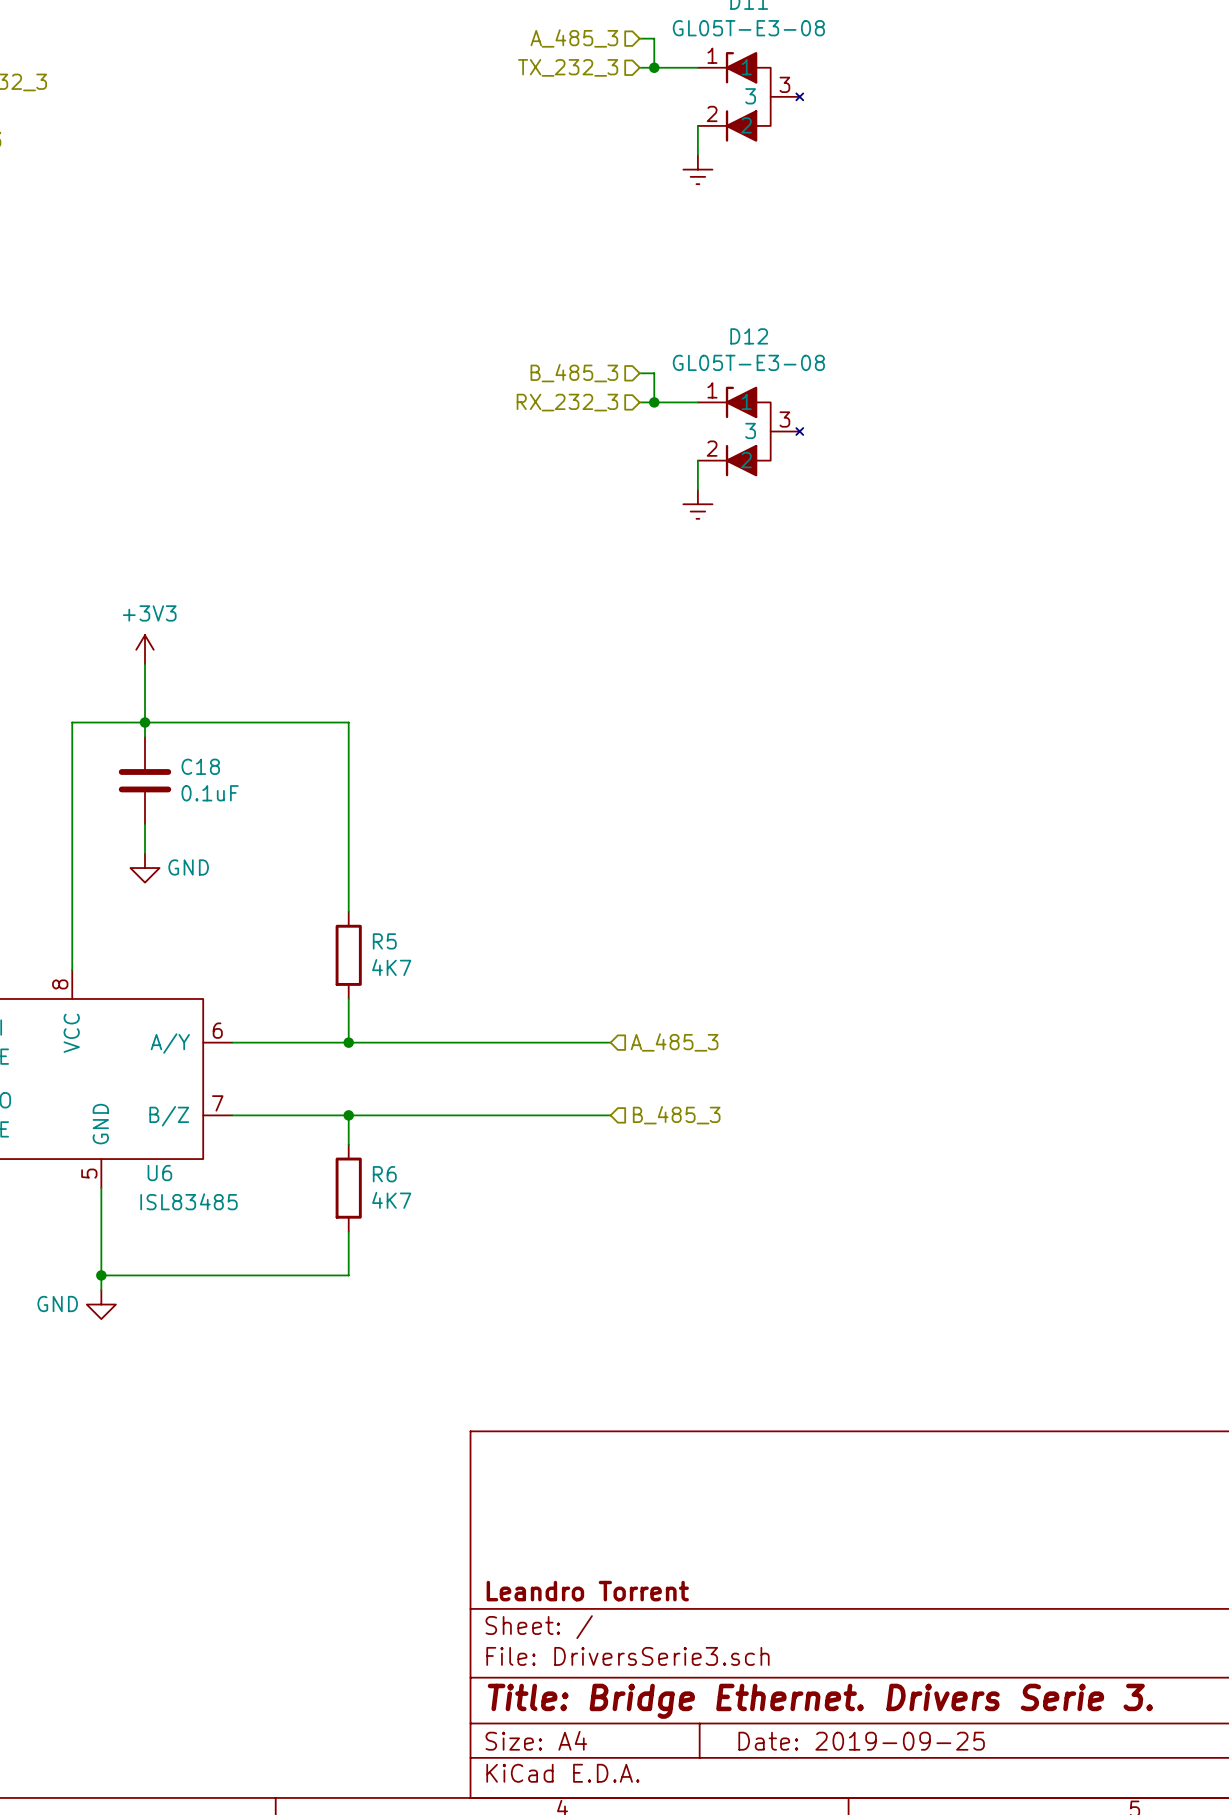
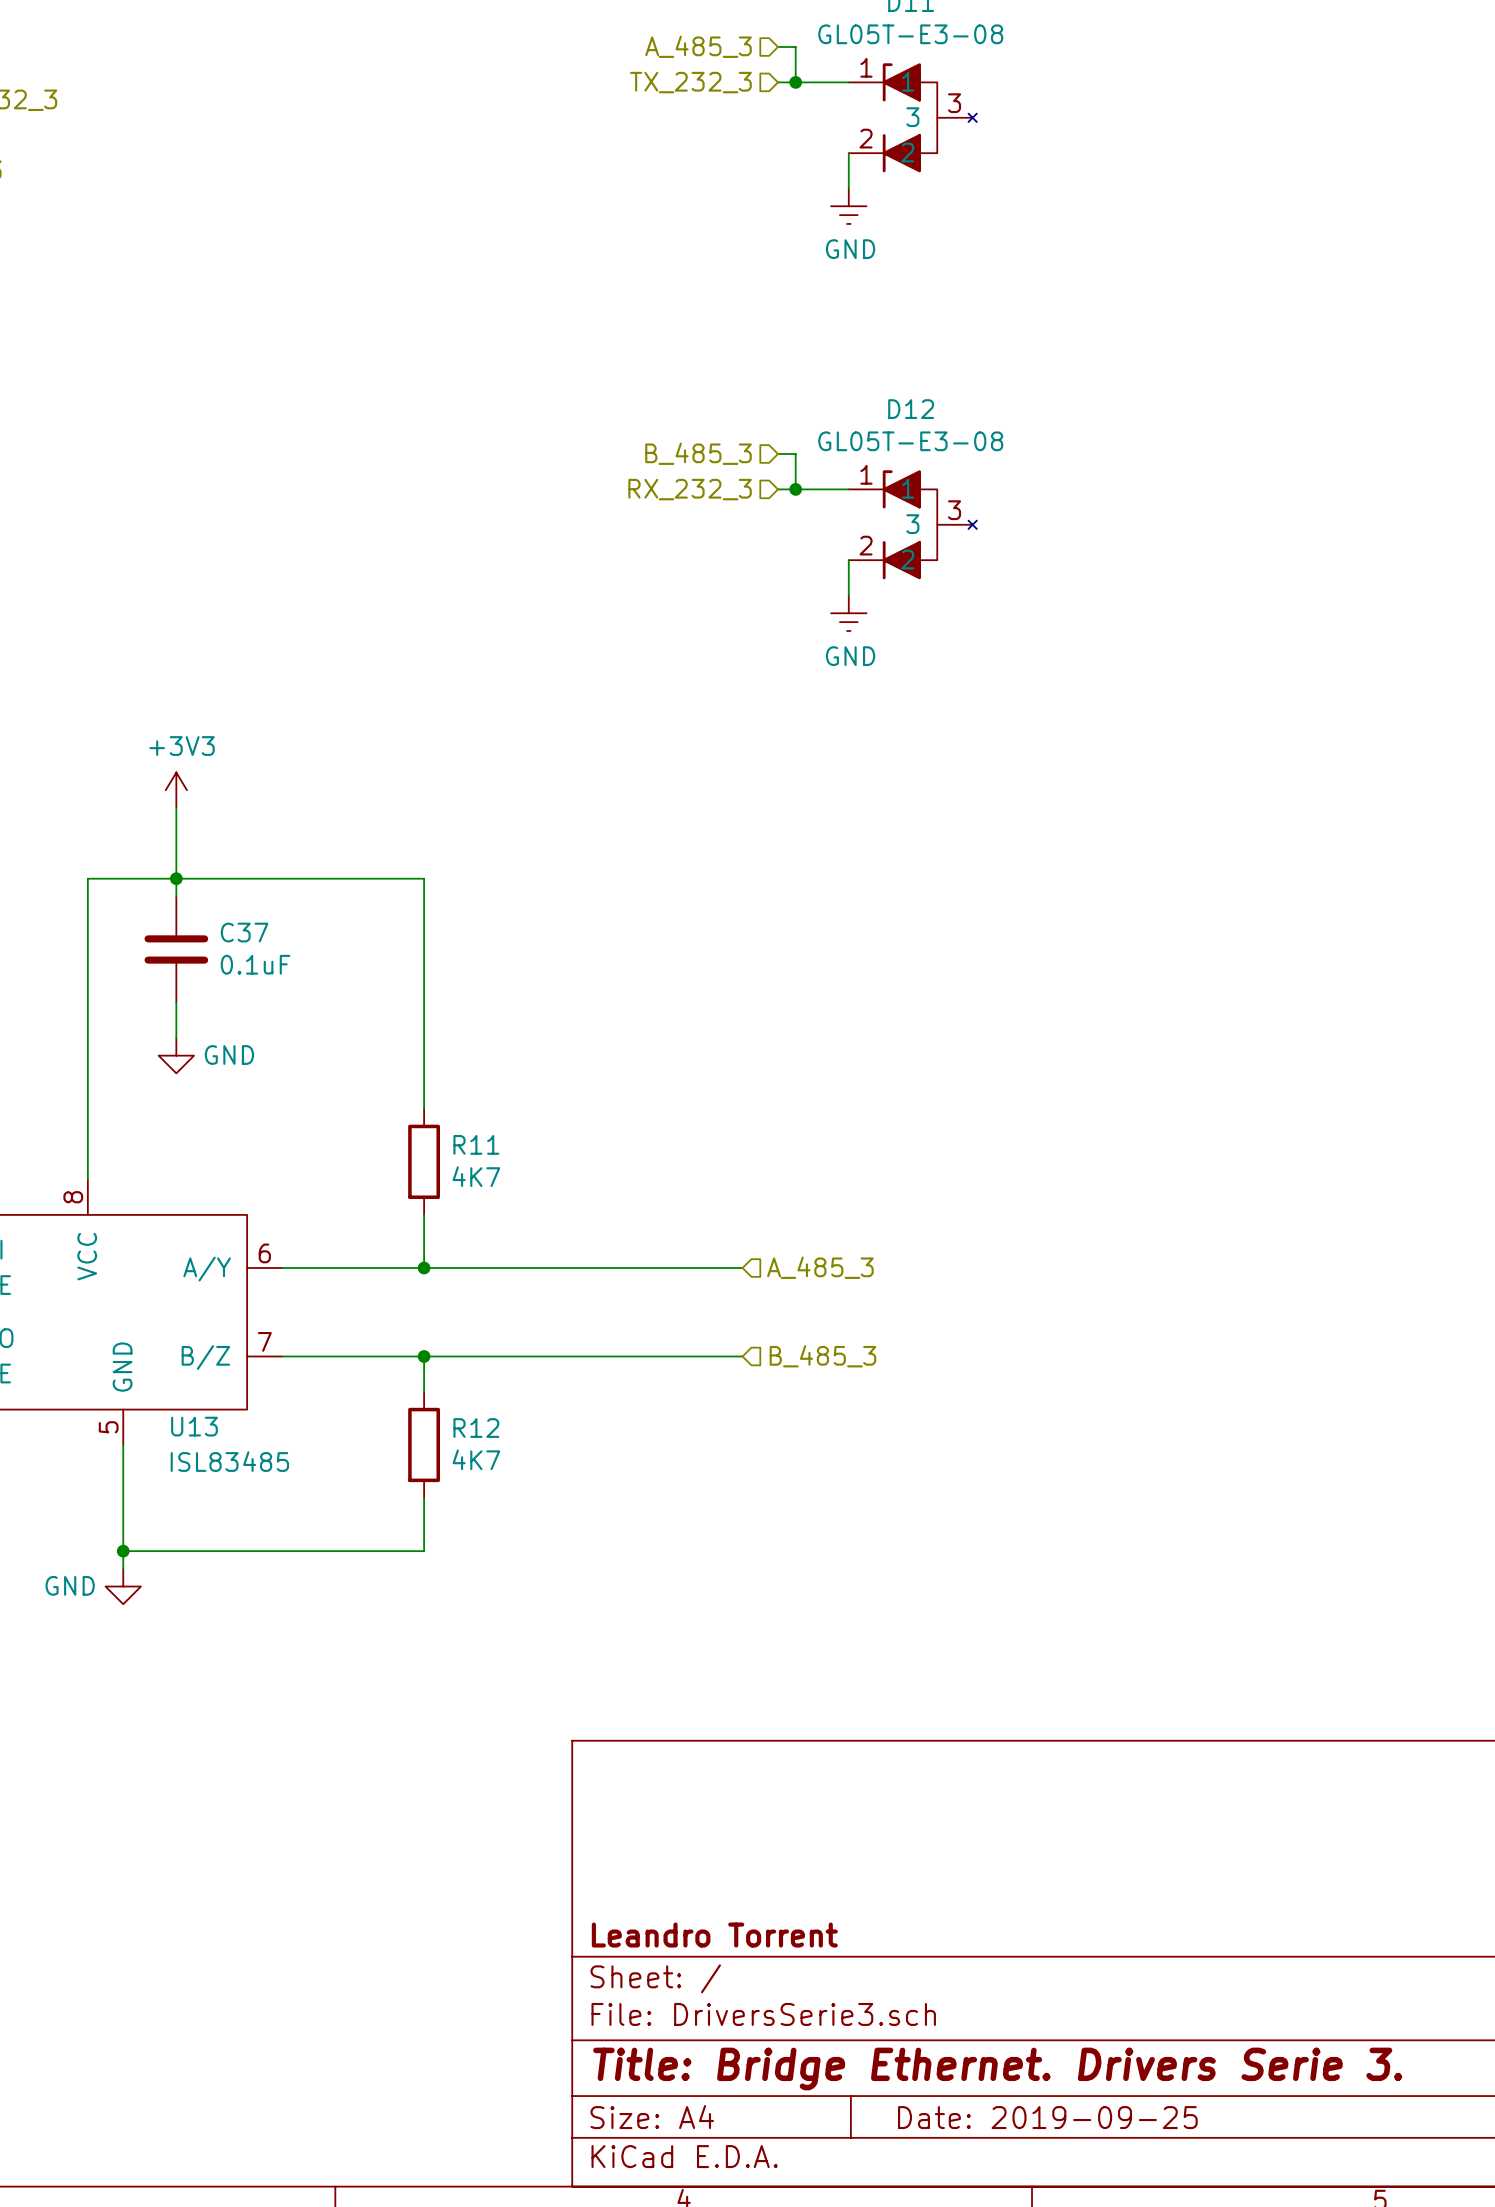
power symbol text: none -> GND (850, 249)
power symbol text: none -> GND (850, 656)
C18 name: C18 (200, 766) -> C37 (244, 932)
R5 name: R5 (384, 941) -> R11 (476, 1144)
U6 name: U6 (159, 1173) -> U13 (194, 1426)
R6 name: R6 (384, 1174) -> R12 (476, 1428)

